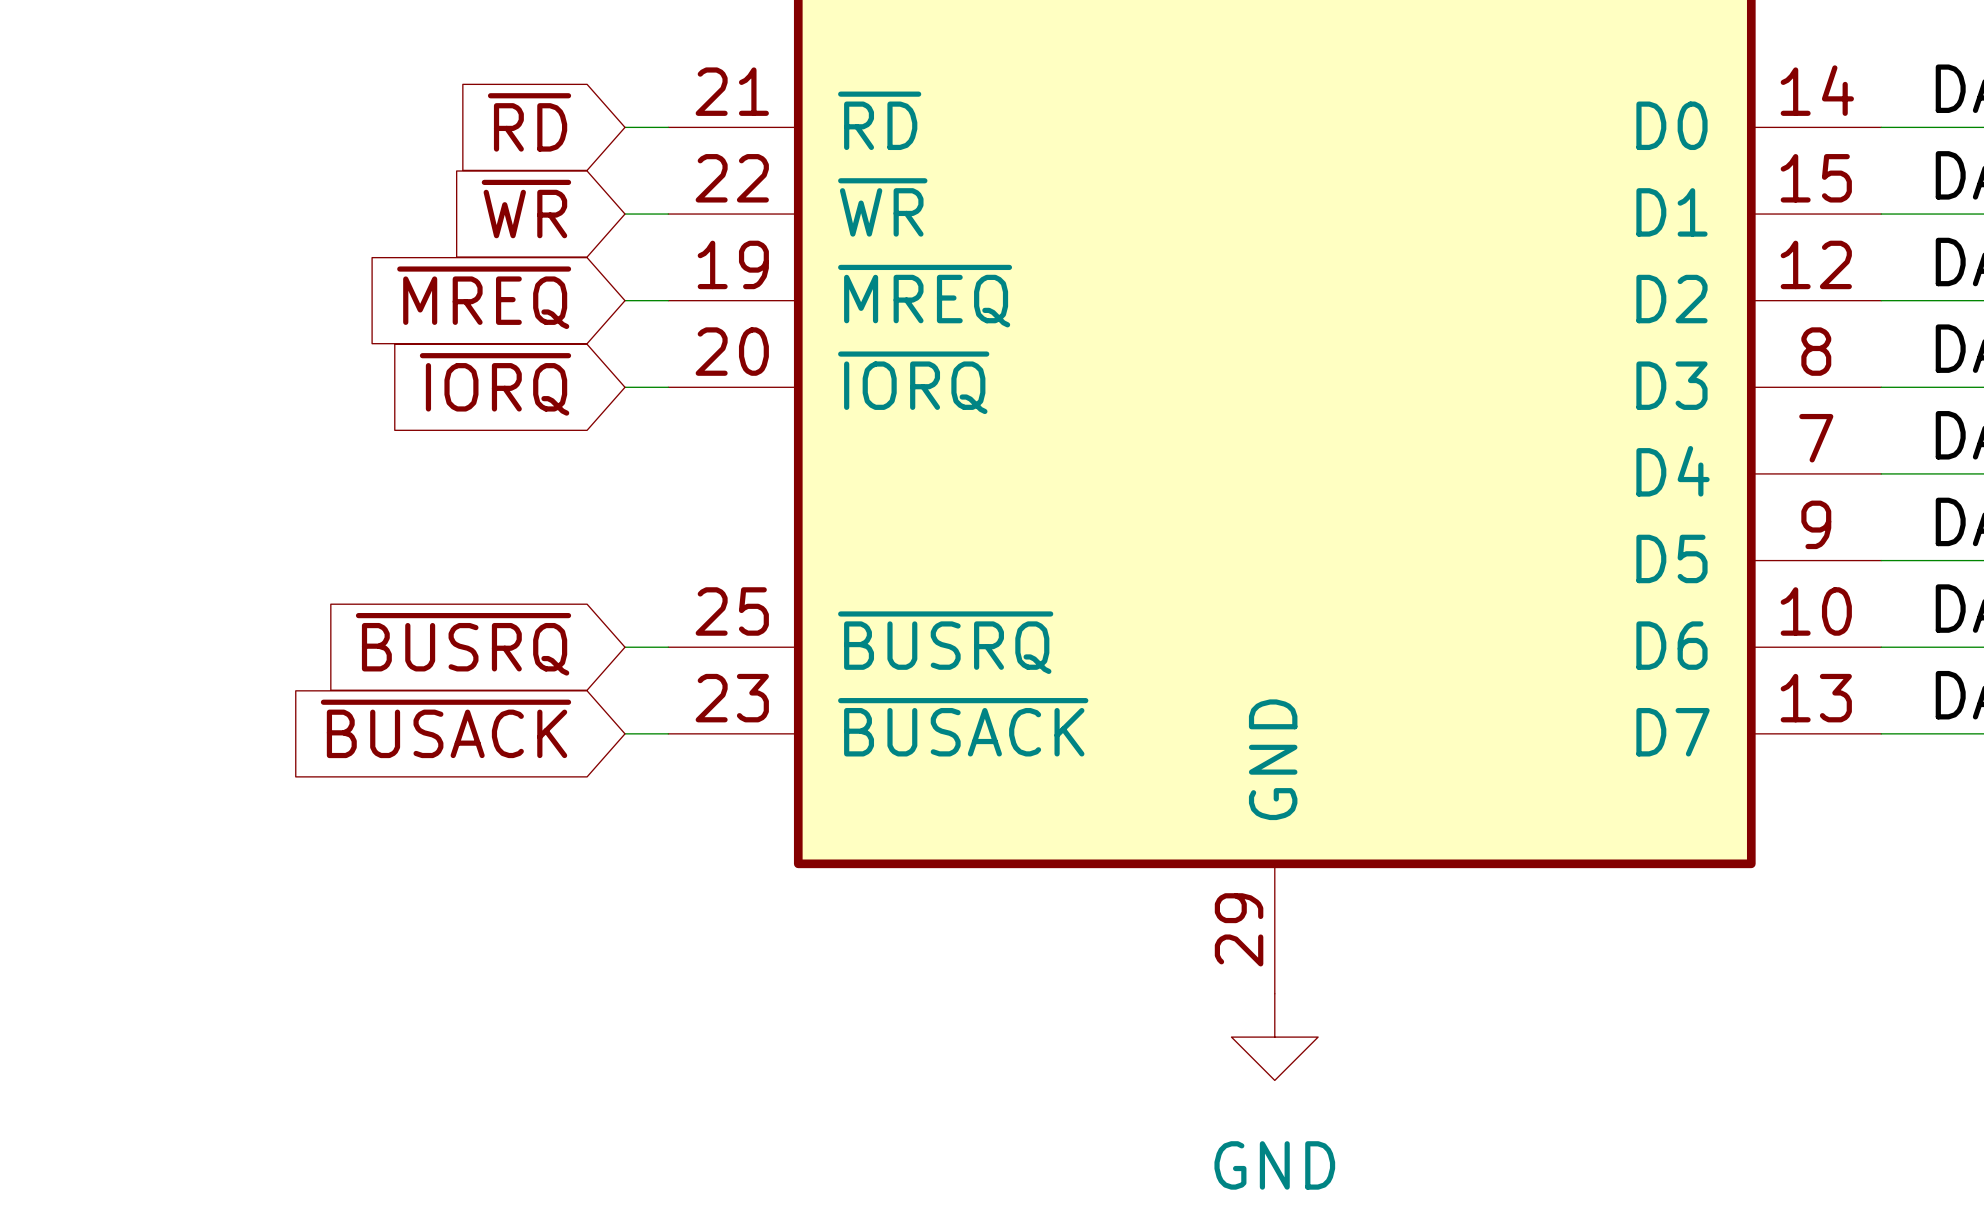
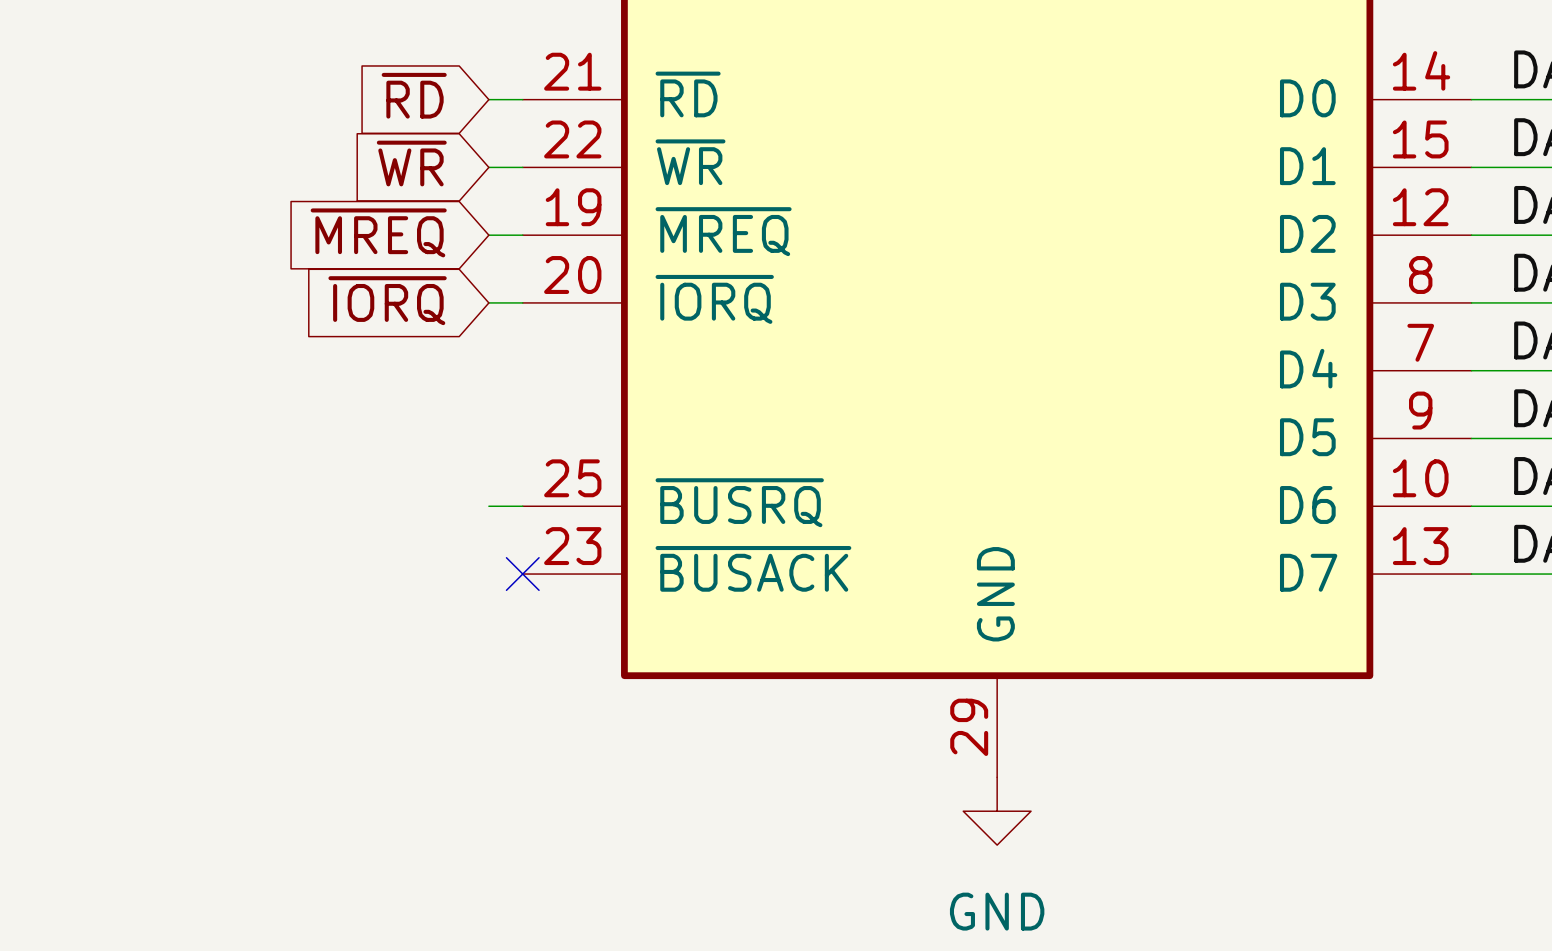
global label: ~{BUSRQ} (463, 644) -> none
global label: ~{BUSACK} (445, 728) -> none
wire: (625, 733) (668, 733) -> none
no-connect mark: none -> (522, 574)

